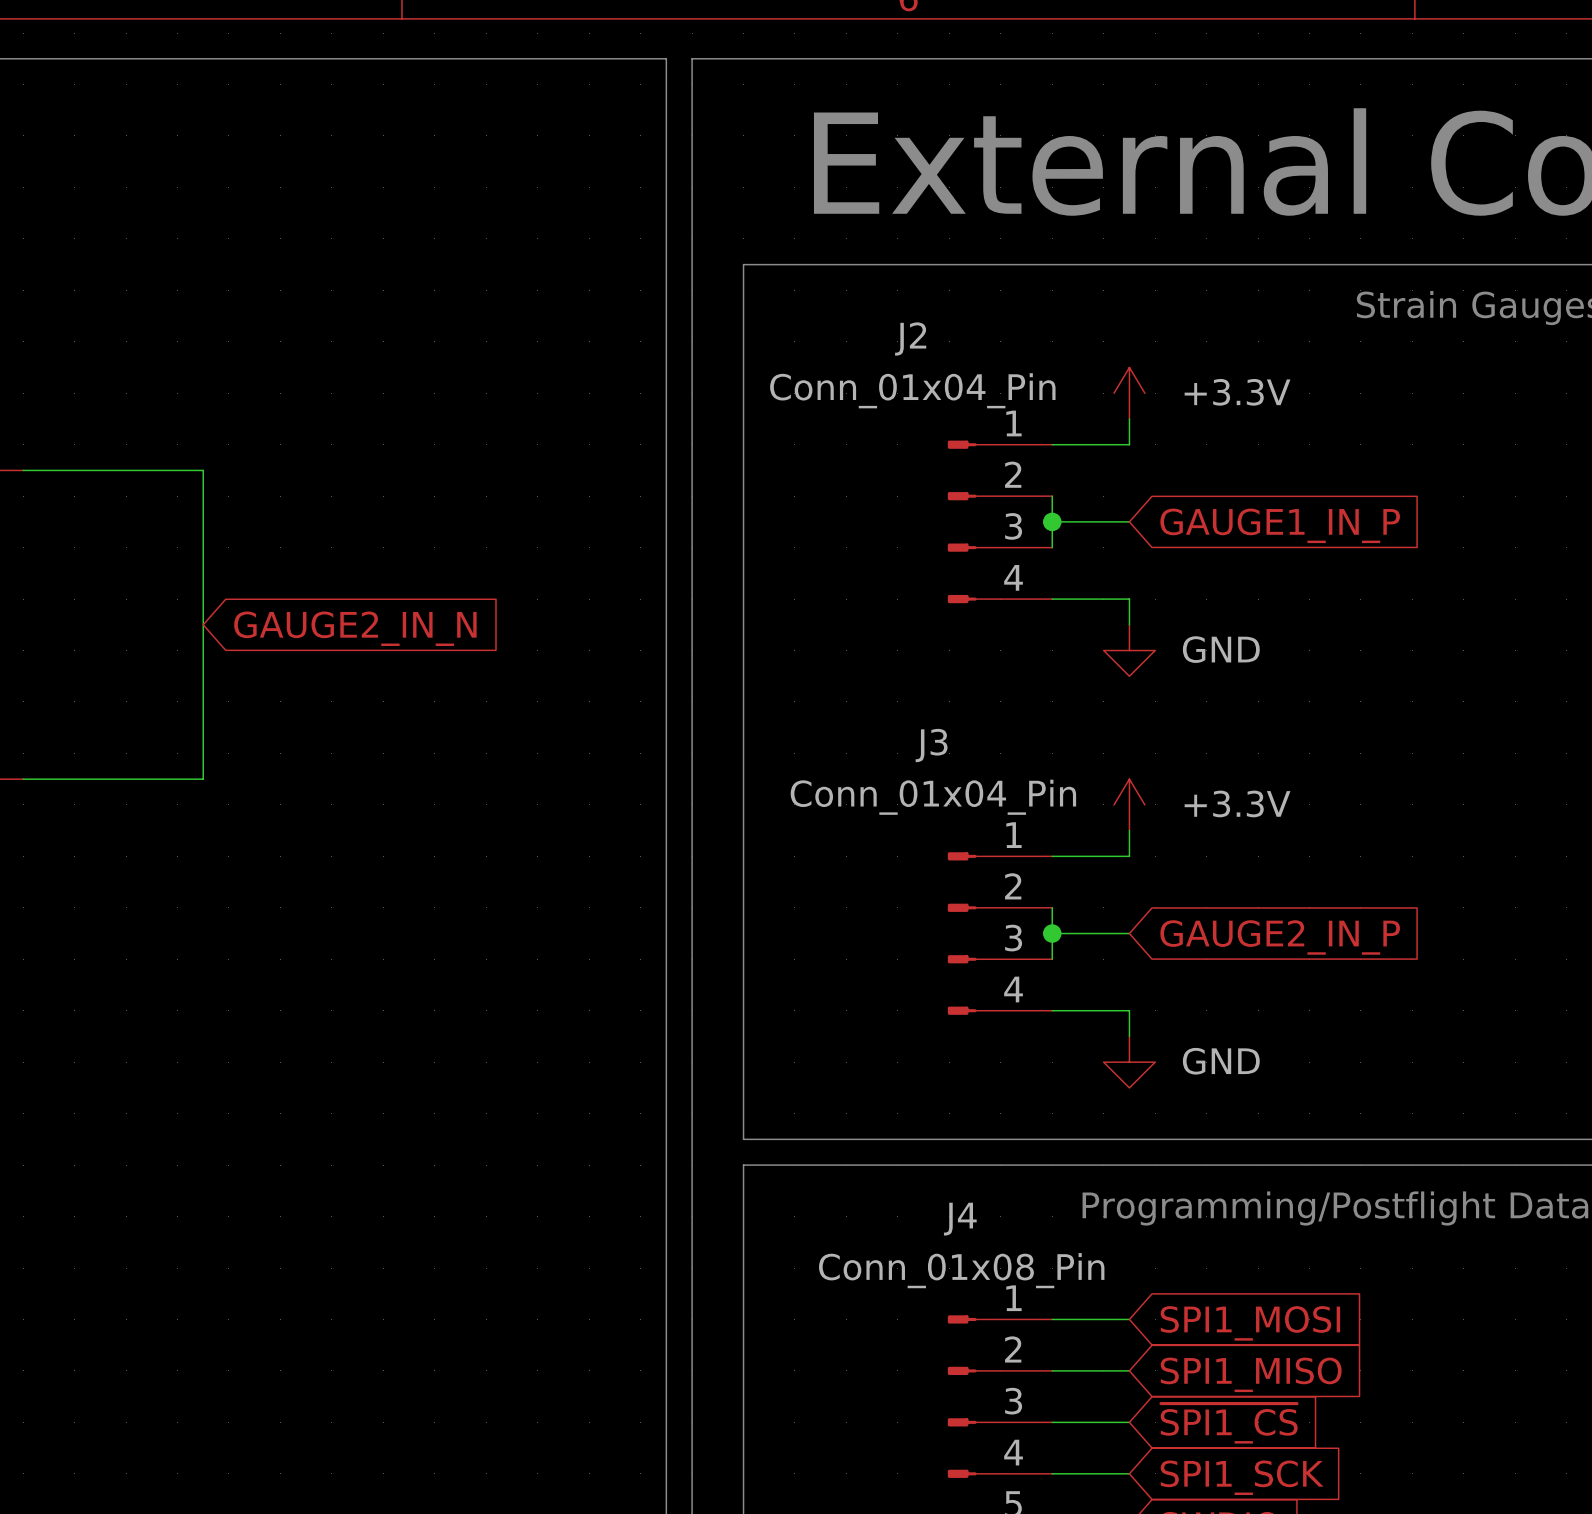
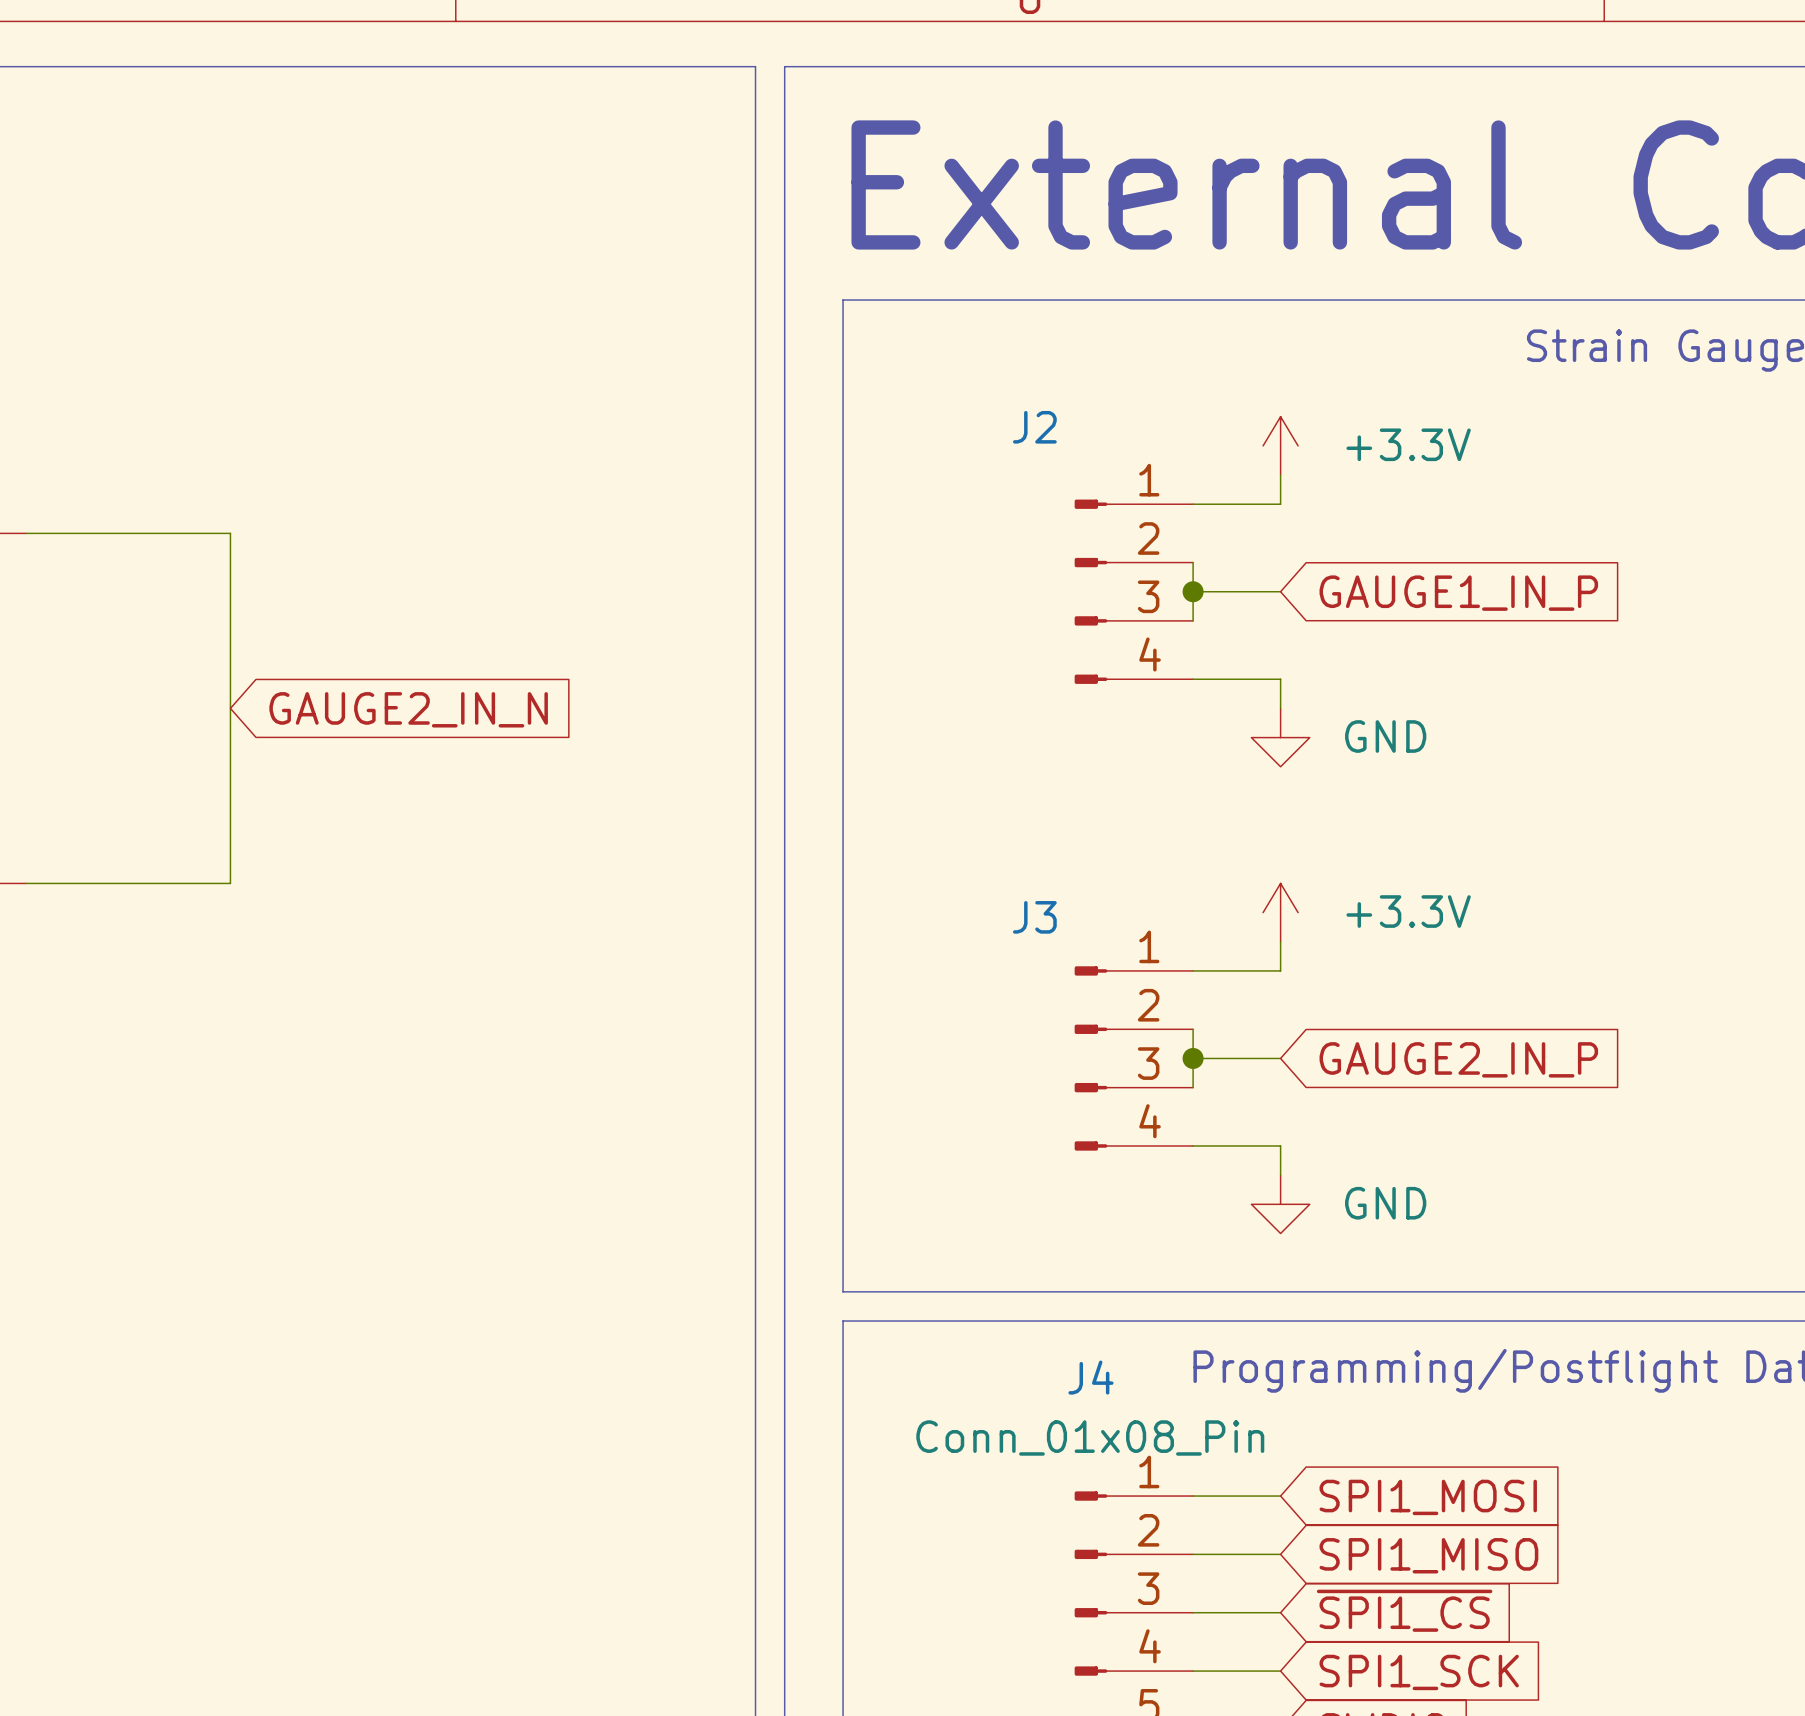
J2 name position: J2 (910, 338) -> J2 (1034, 427)
J2 value: Conn_01x04_Pin (912, 390) -> none
J3 name position: J3 (931, 745) -> J3 (1034, 917)
J3 value: Conn_01x04_Pin (933, 797) -> none

